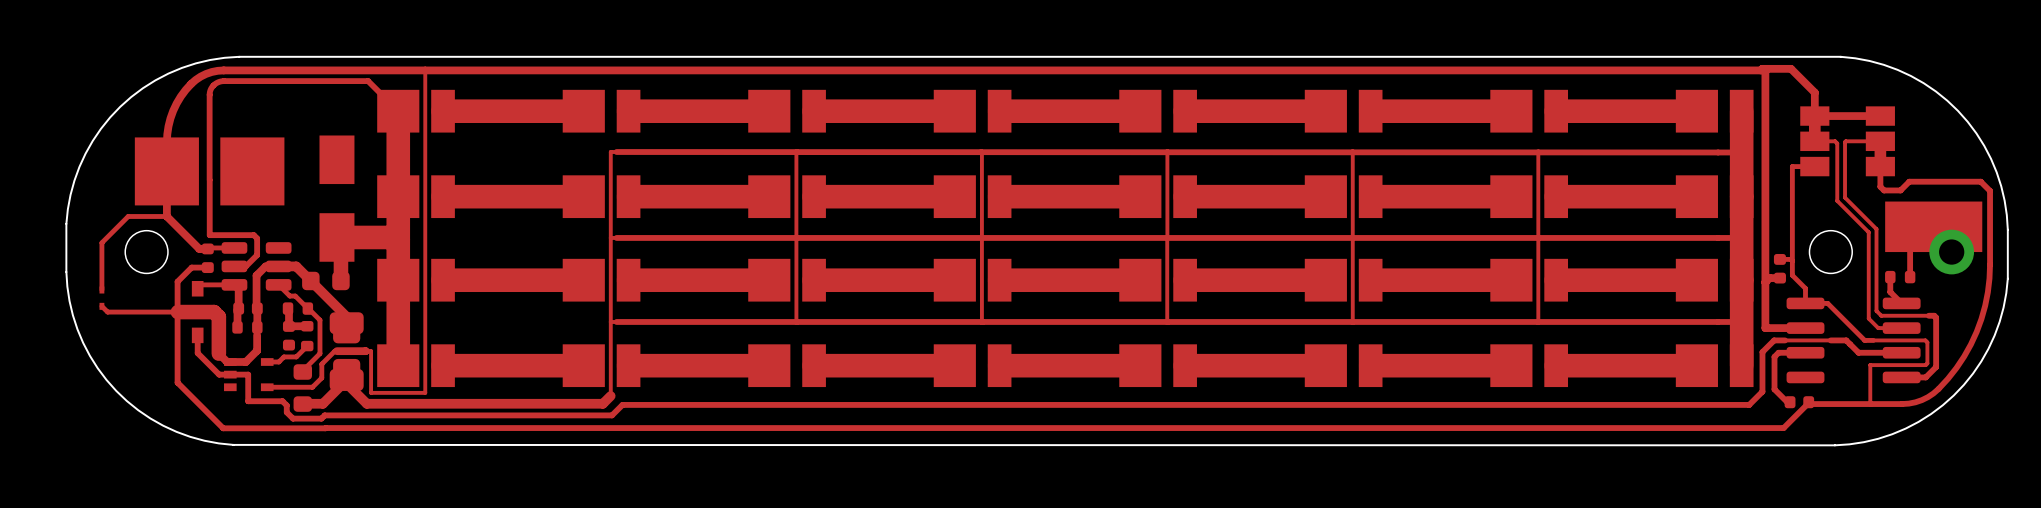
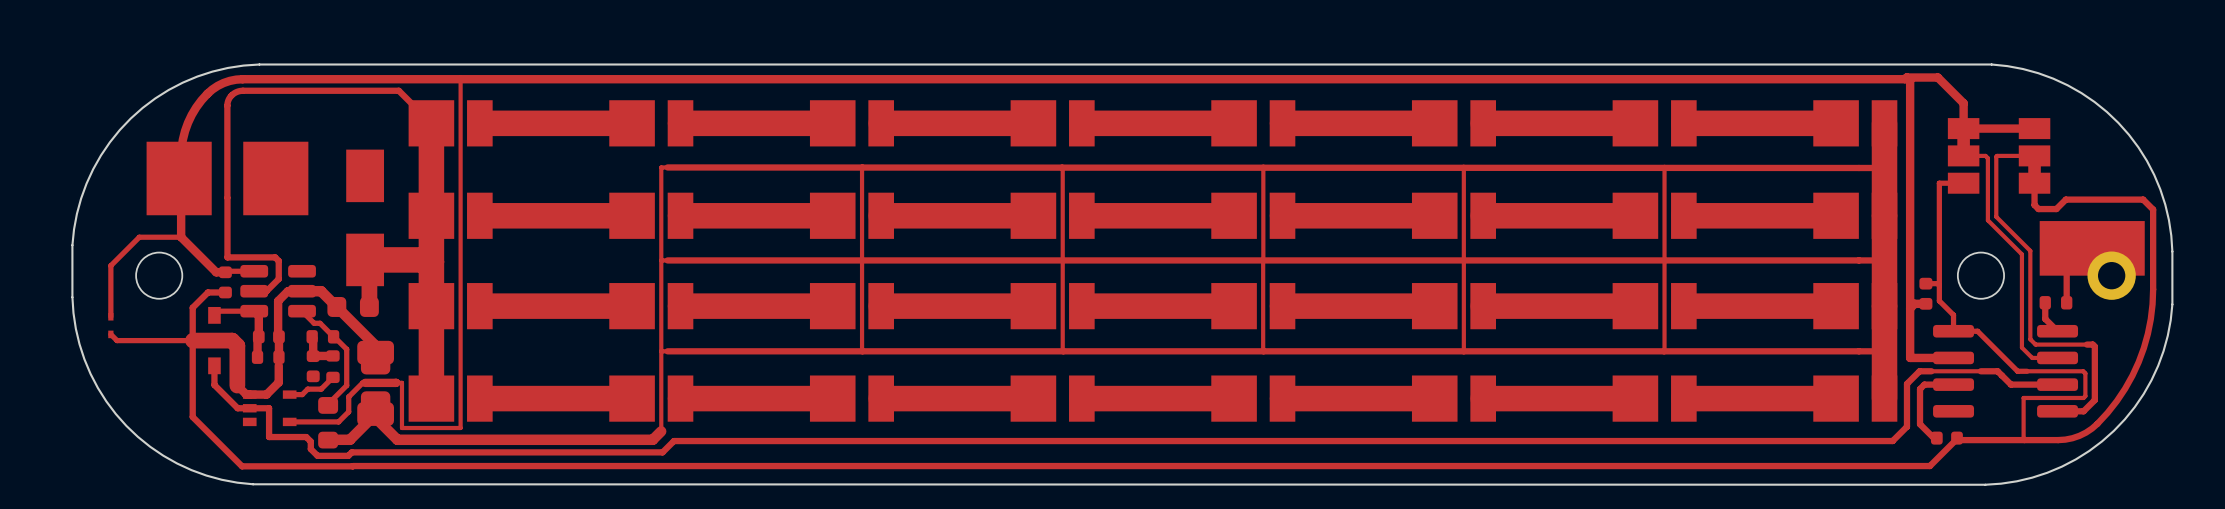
part footprint: [134, 137, 285, 206] -> [146, 141, 309, 216]

